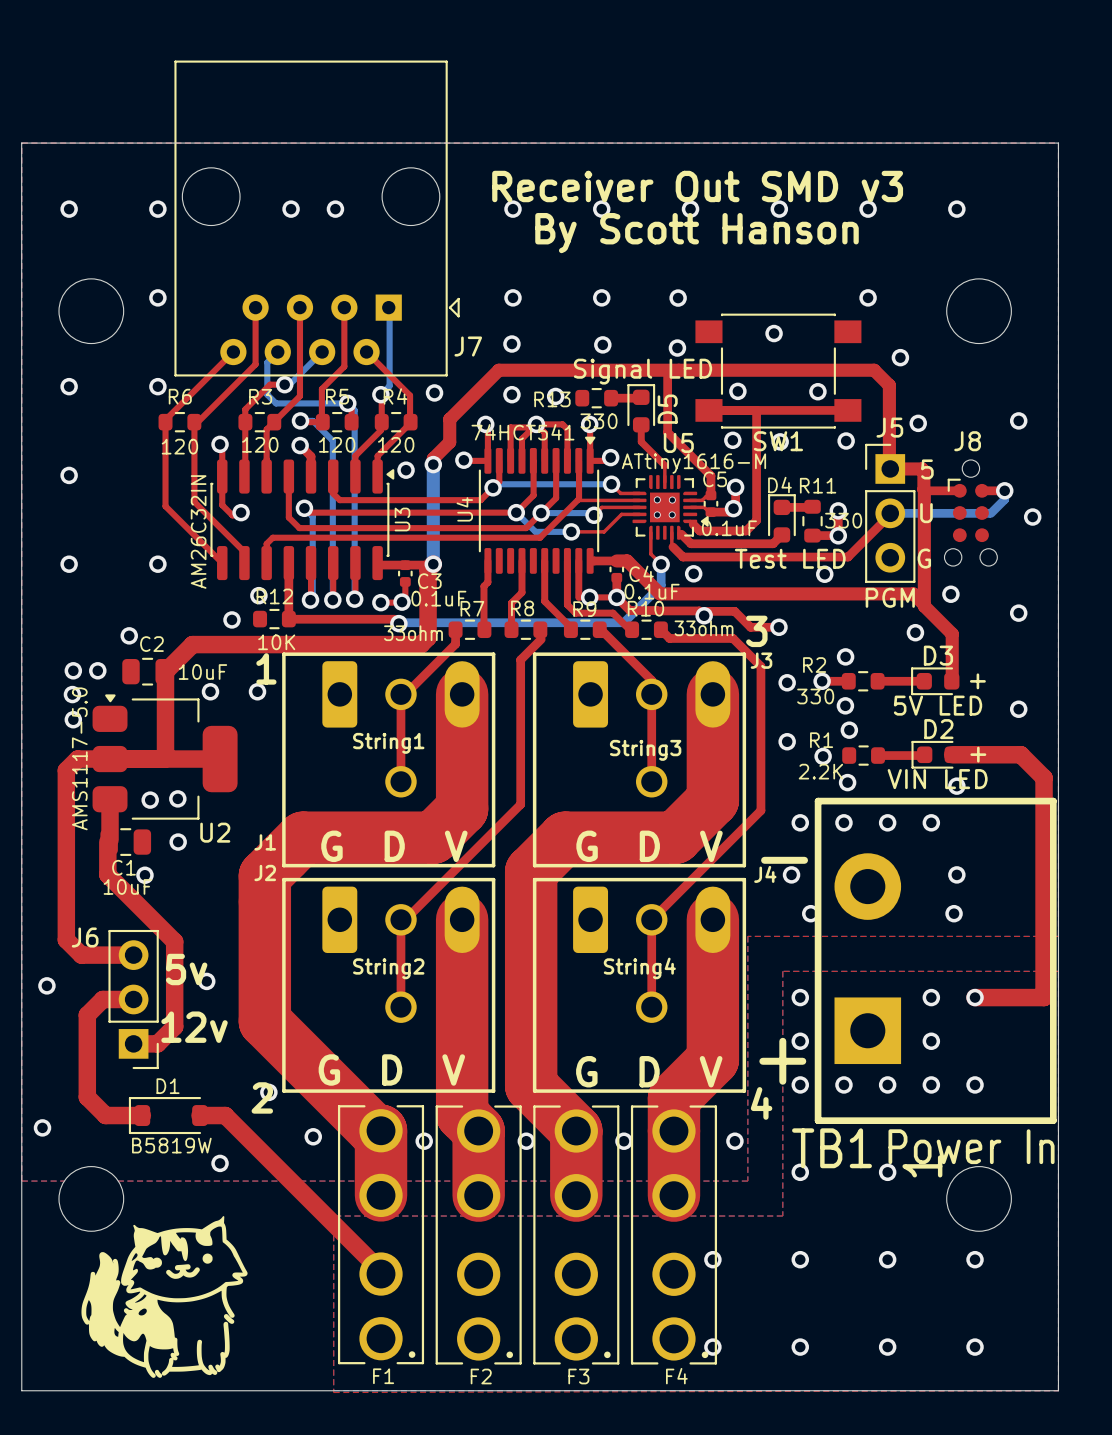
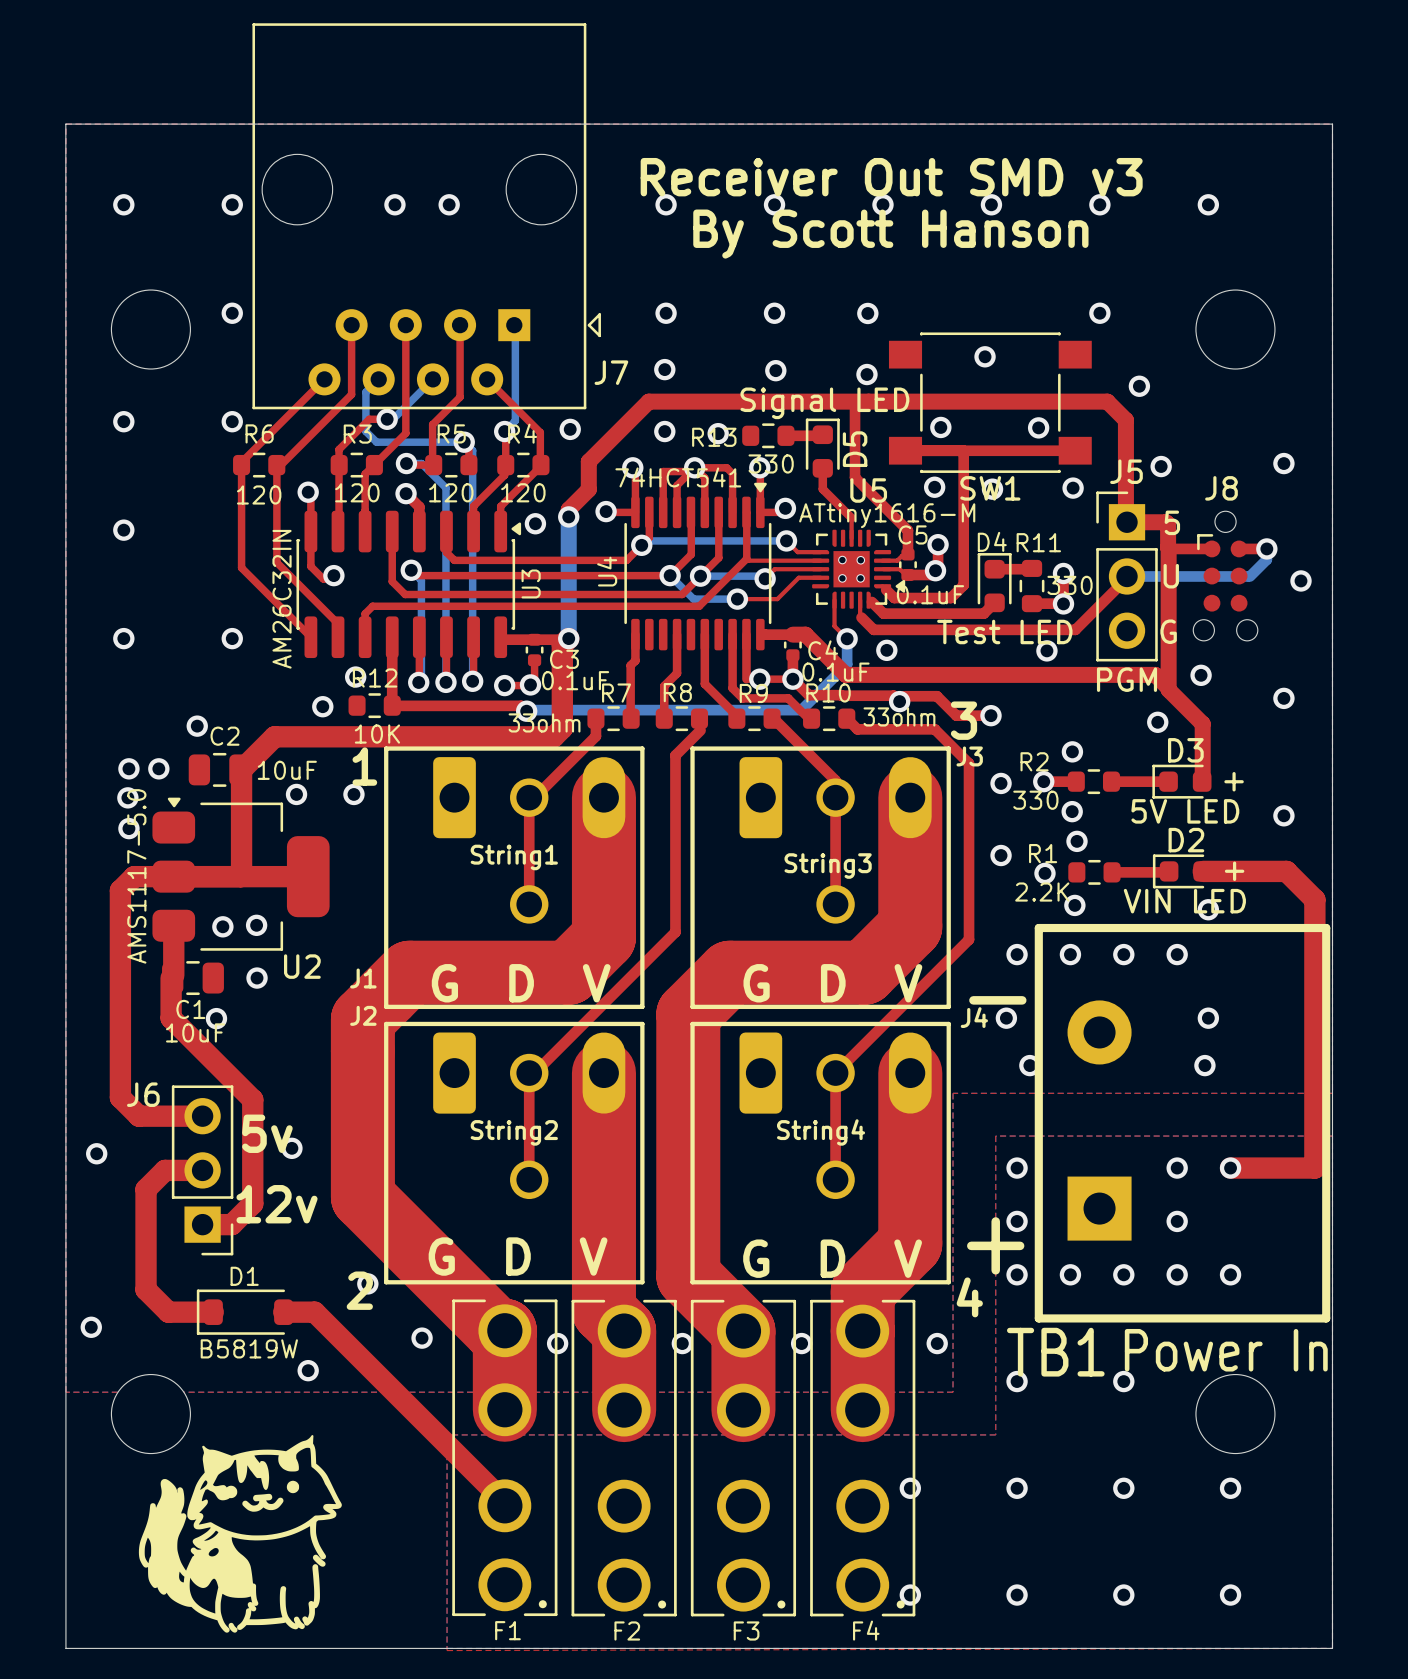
TB1 footprint: [814, 797, 1057, 1124] -> [1034, 923, 1331, 1323]

